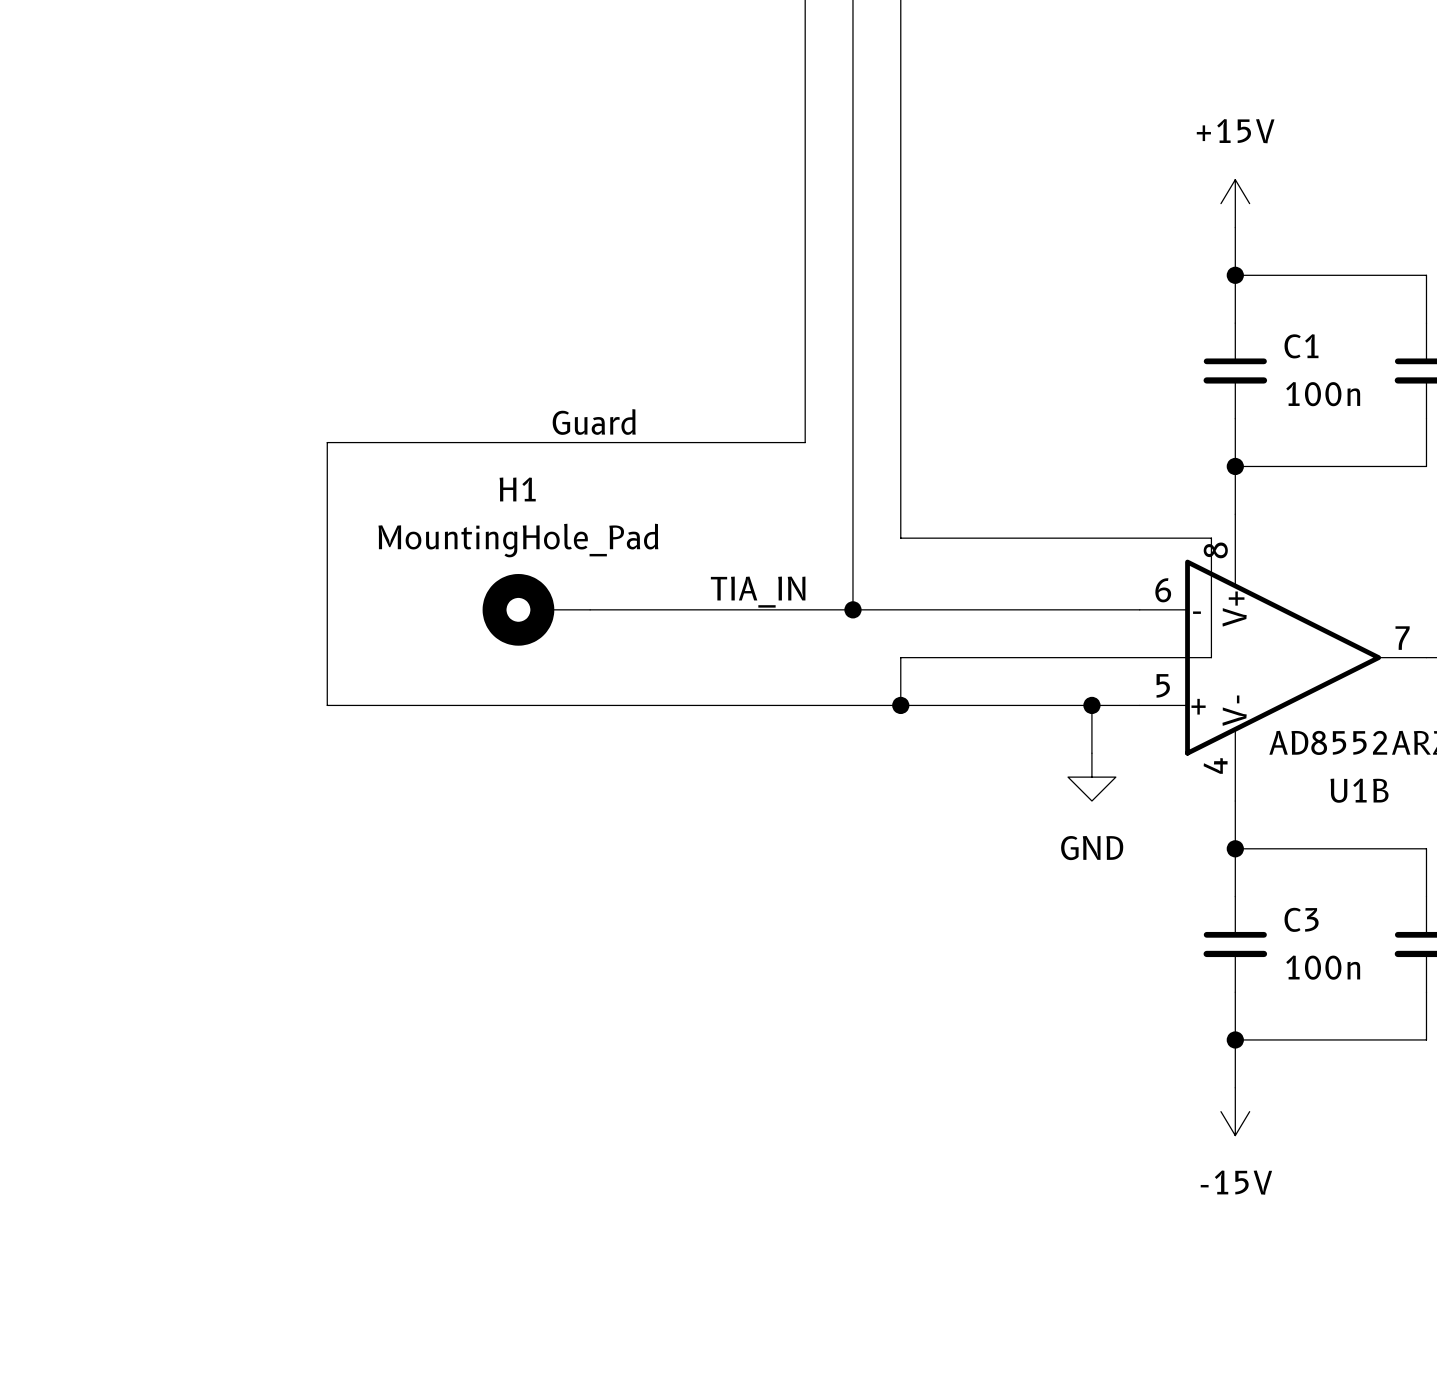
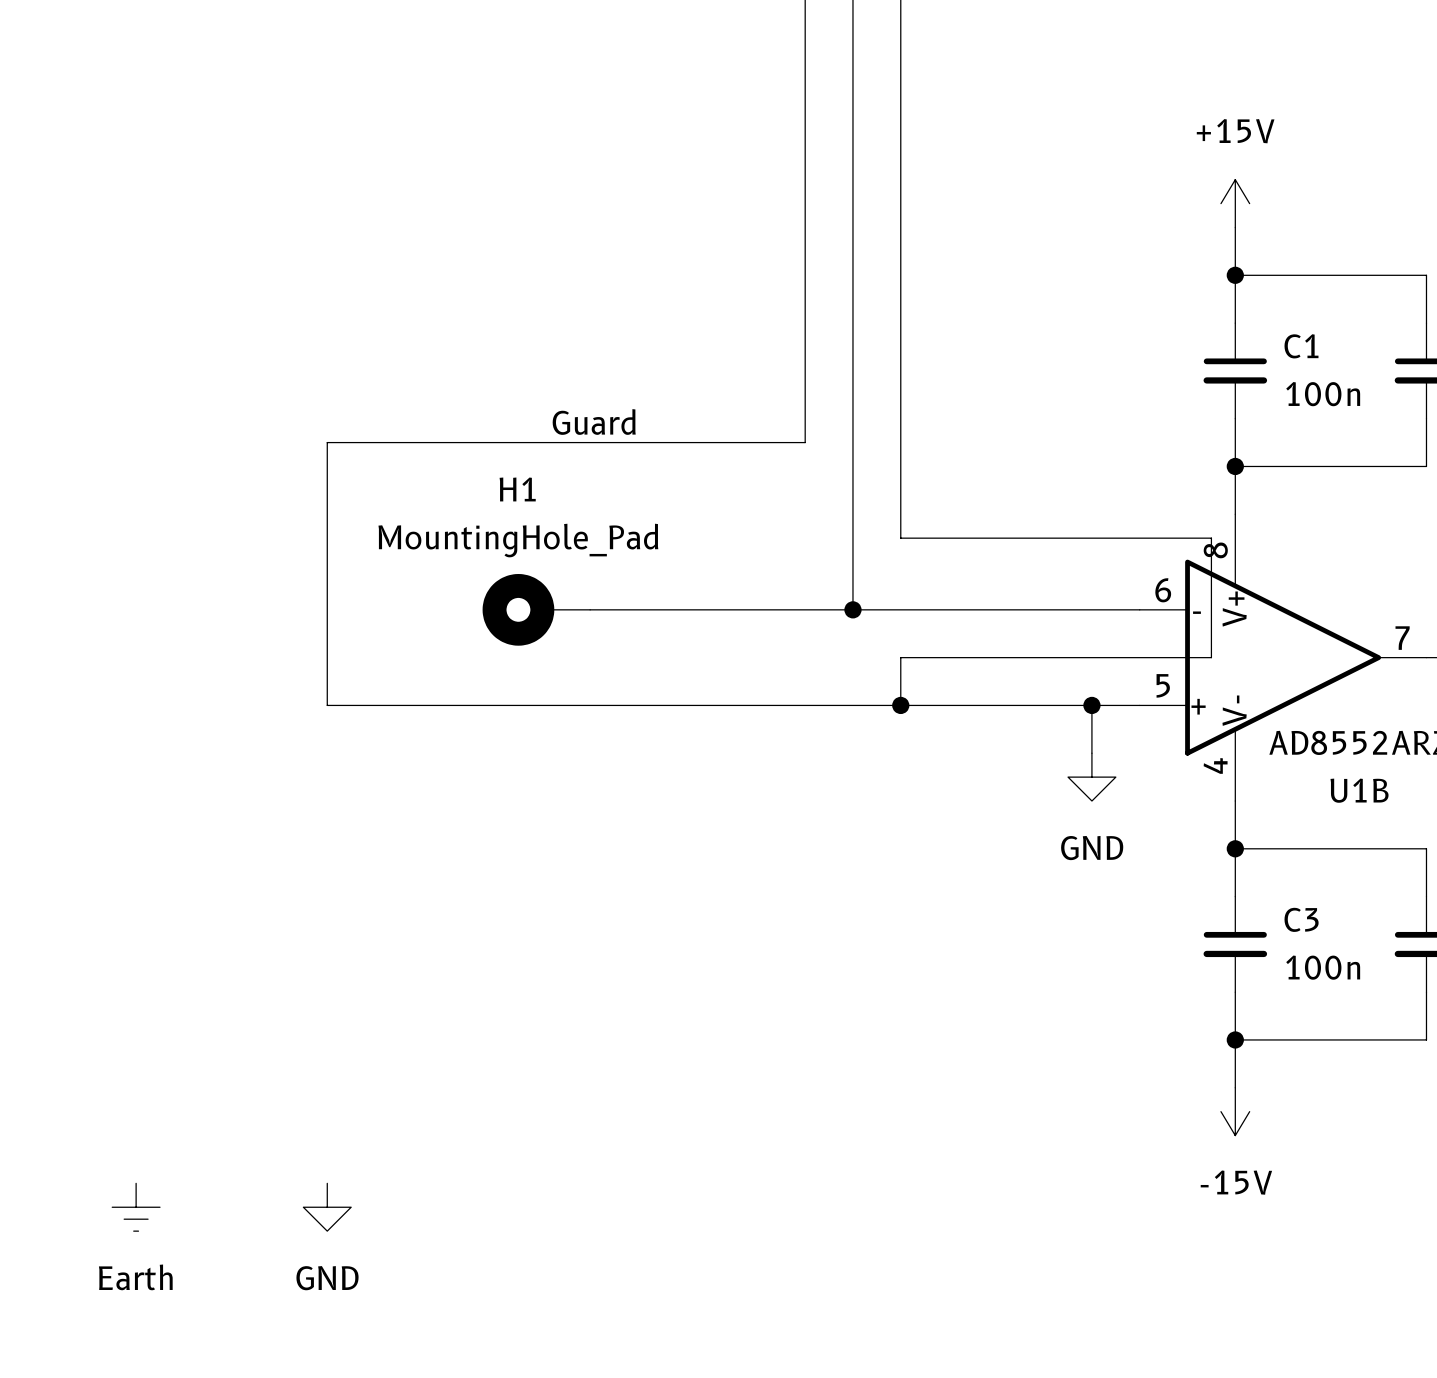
label: TIA_IN (758, 592) -> none
power symbol: none -> Earth (136, 1207)
power symbol: none -> GND (327, 1207)

